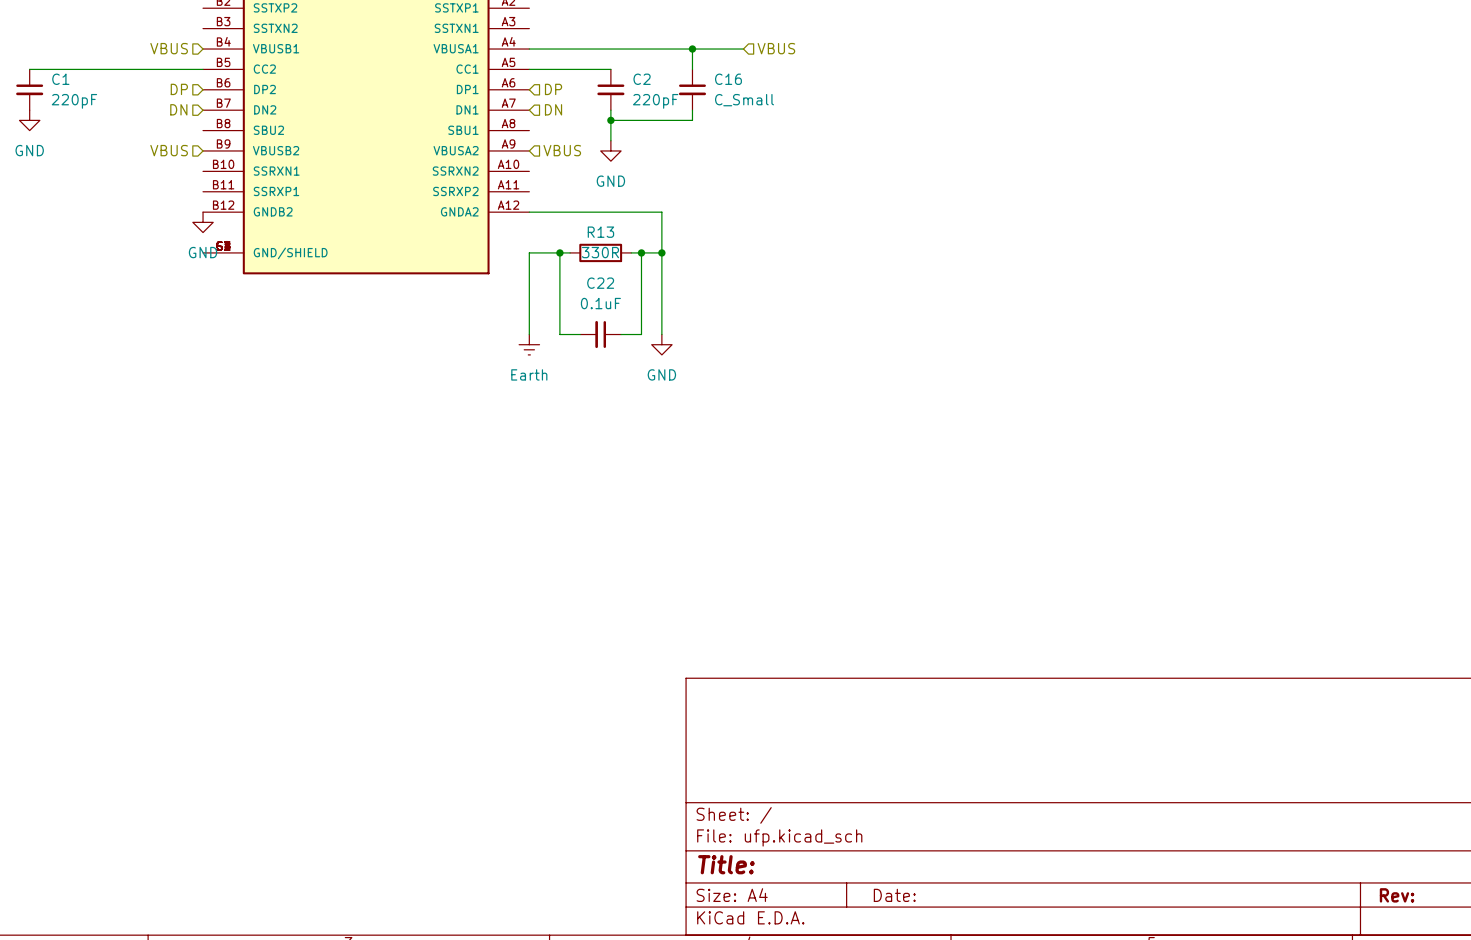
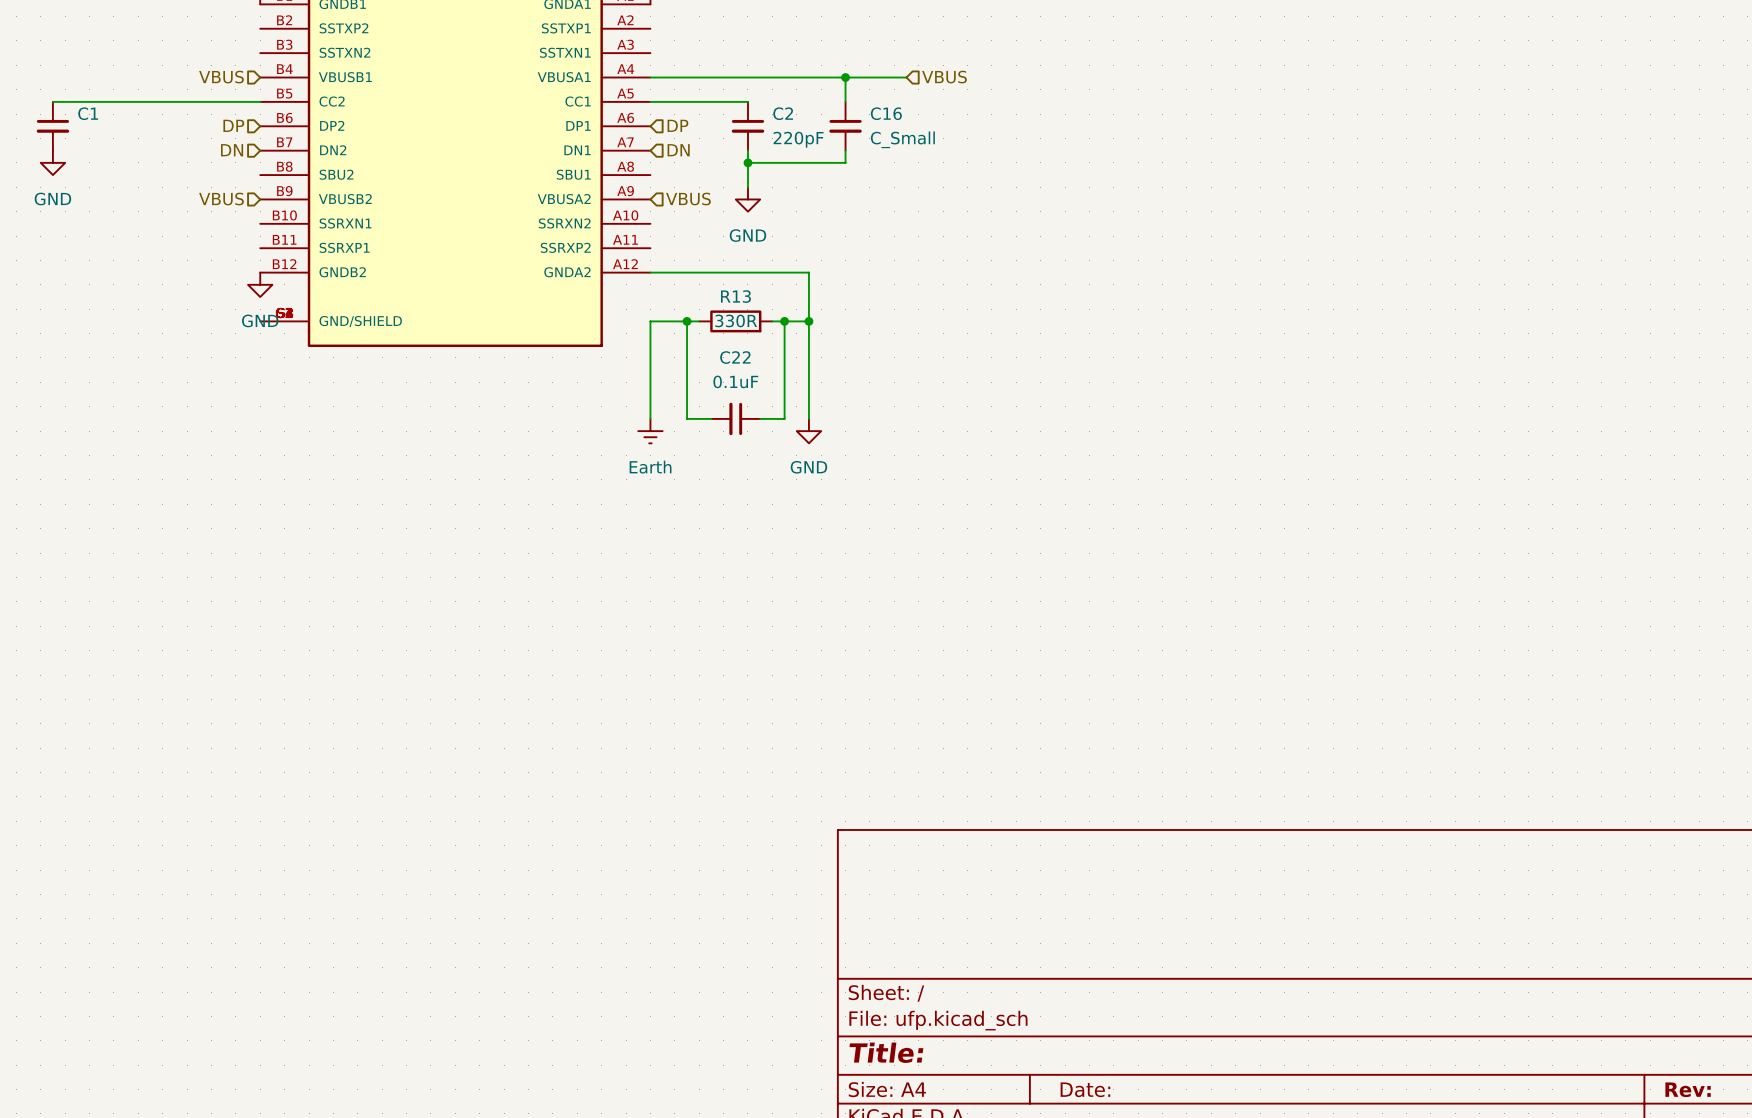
C1 value: 220pF (74, 101) -> none

